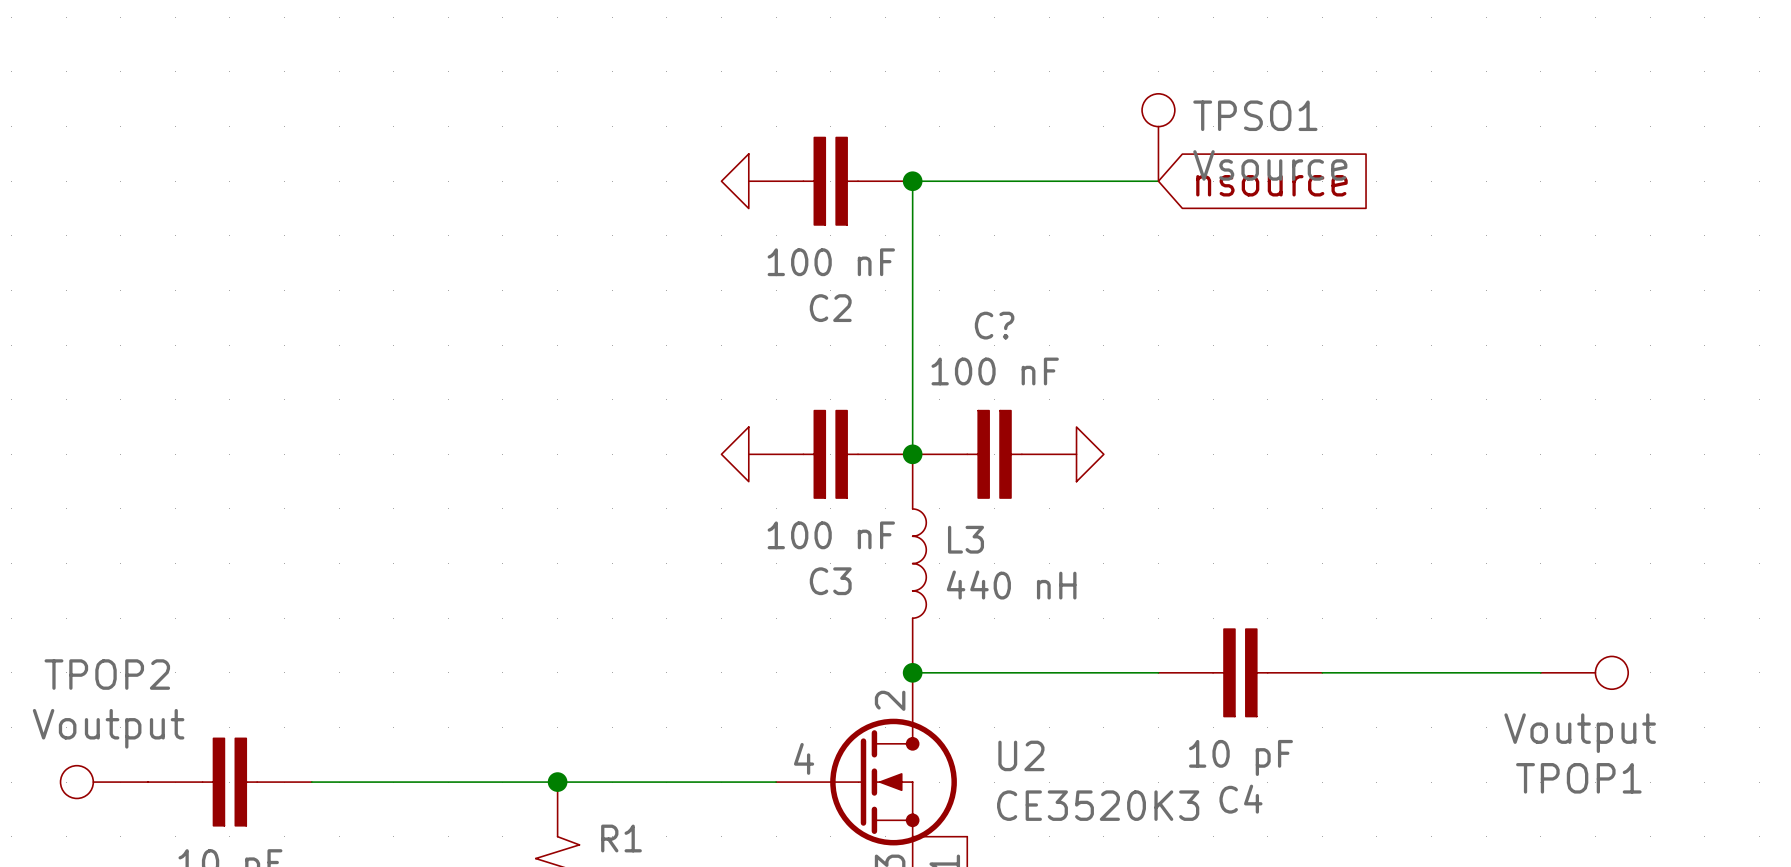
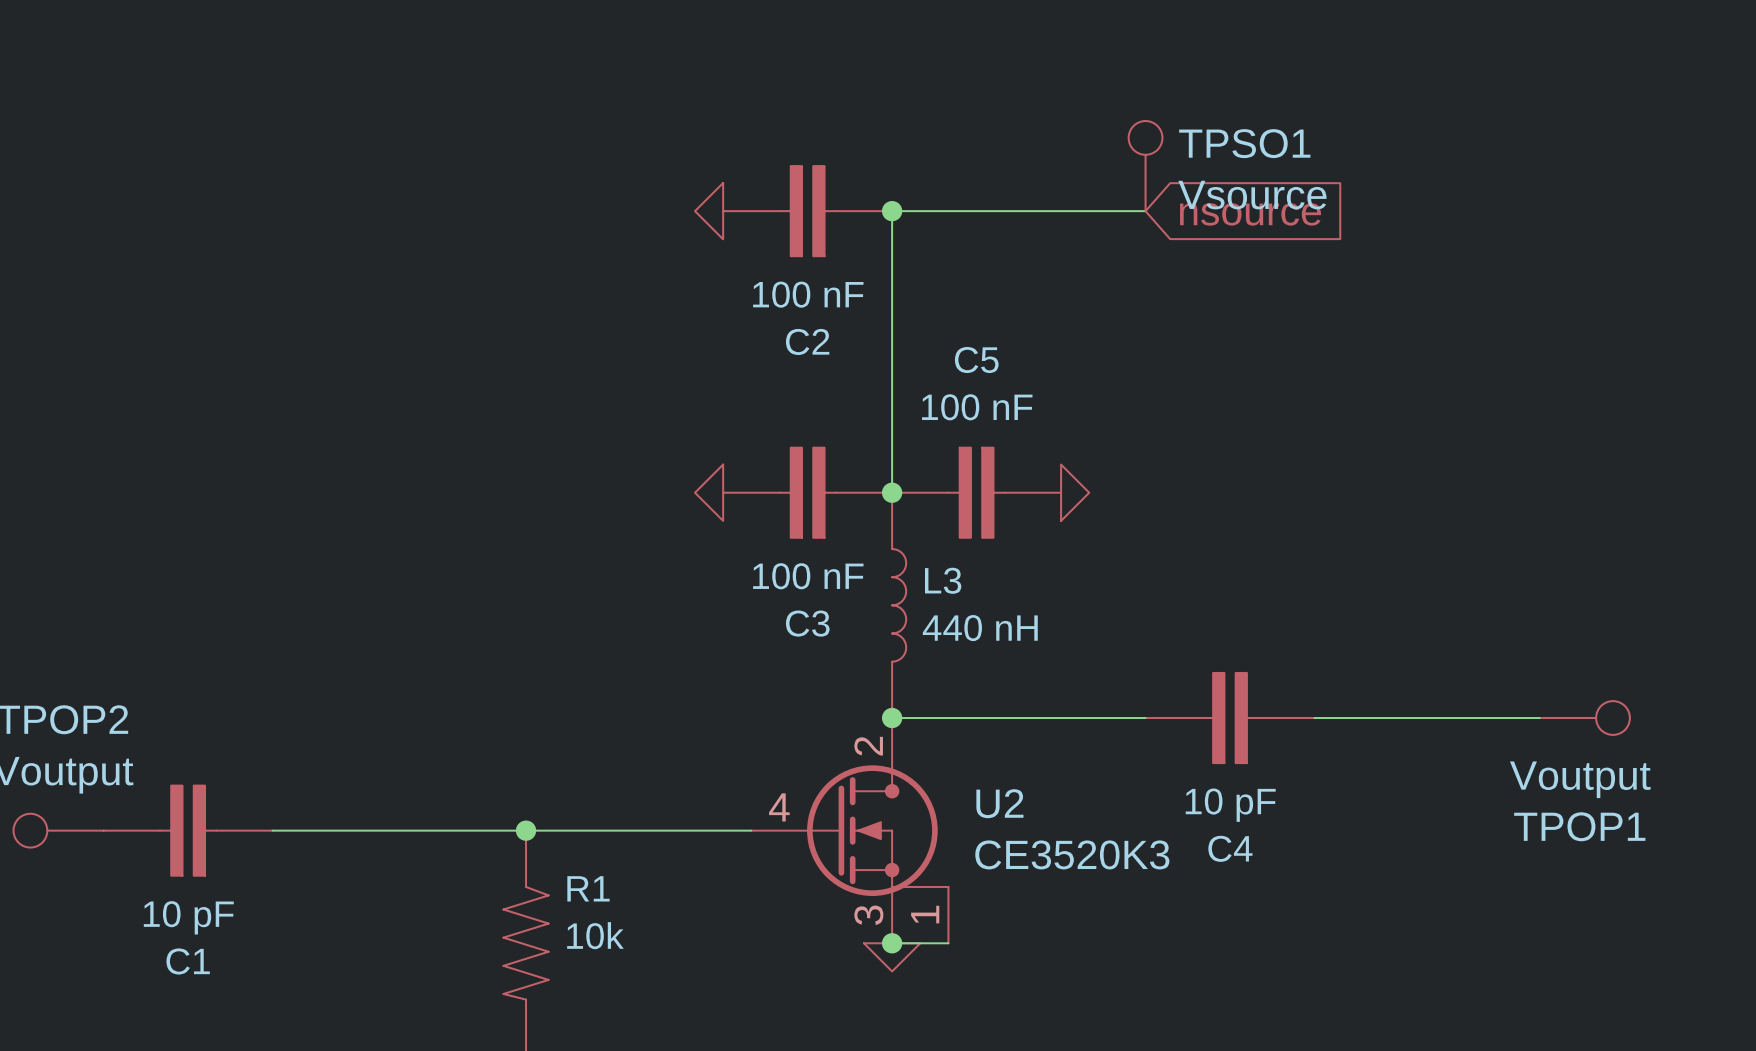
C? name: C? (994, 325) -> C5 (976, 359)

